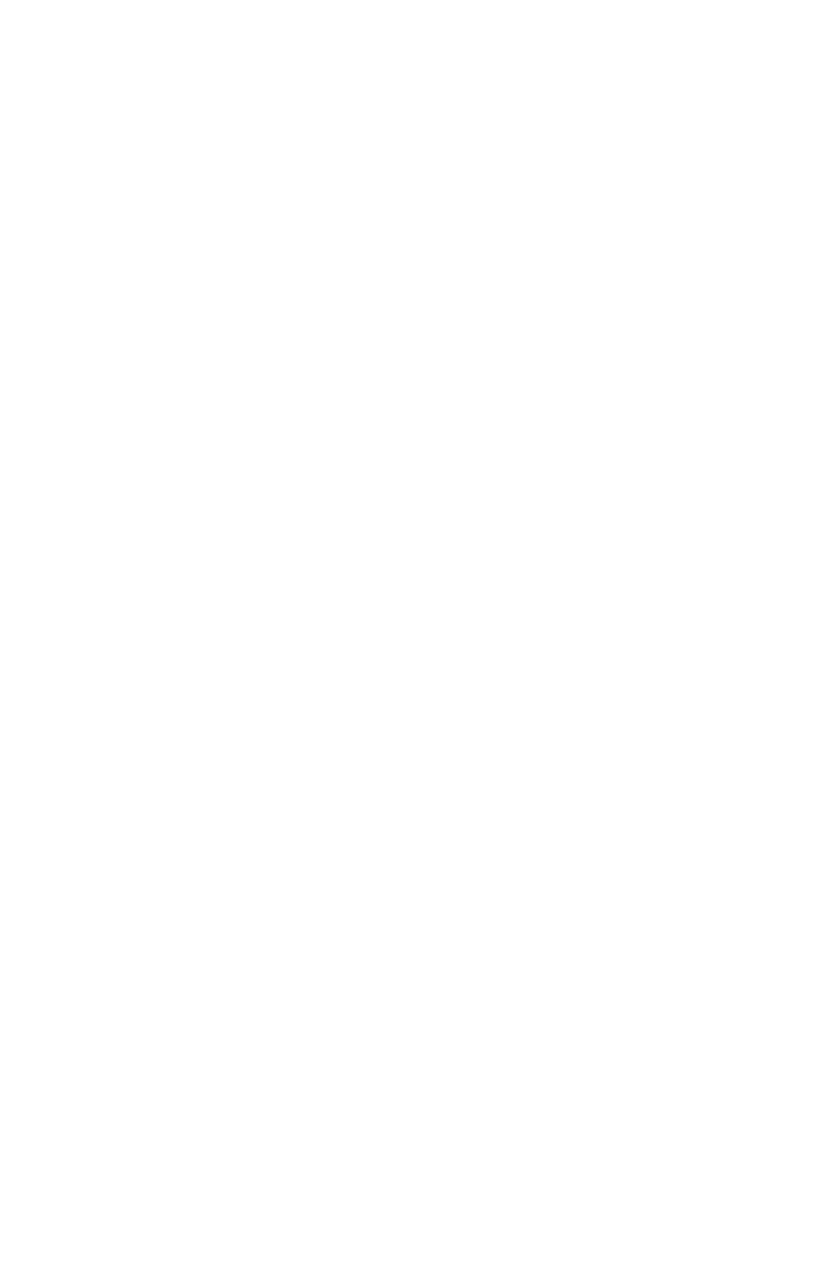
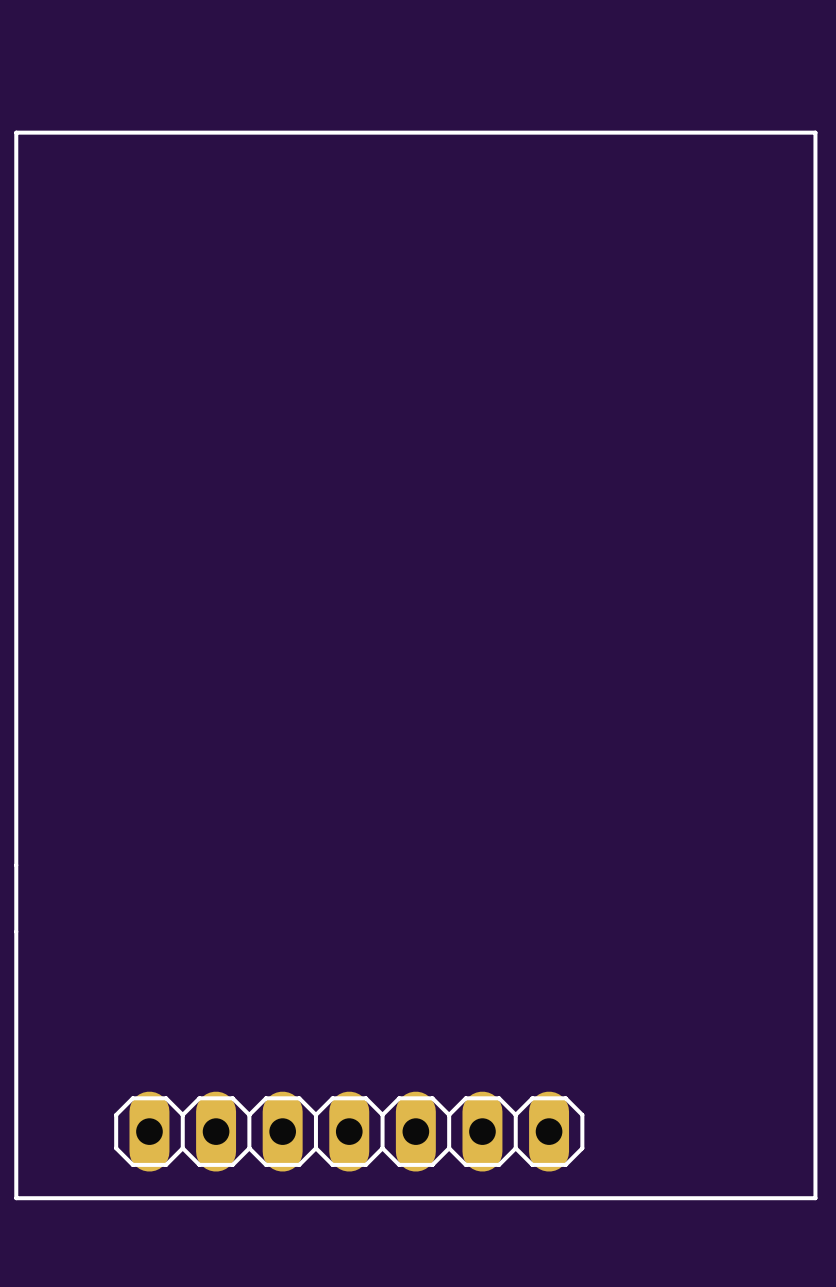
part: none -> (415, 665)

